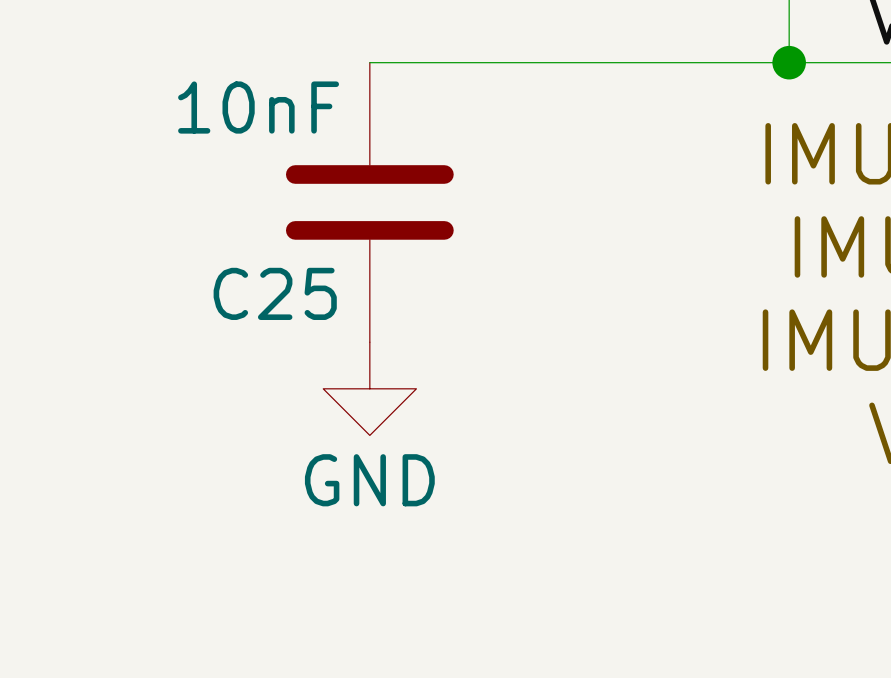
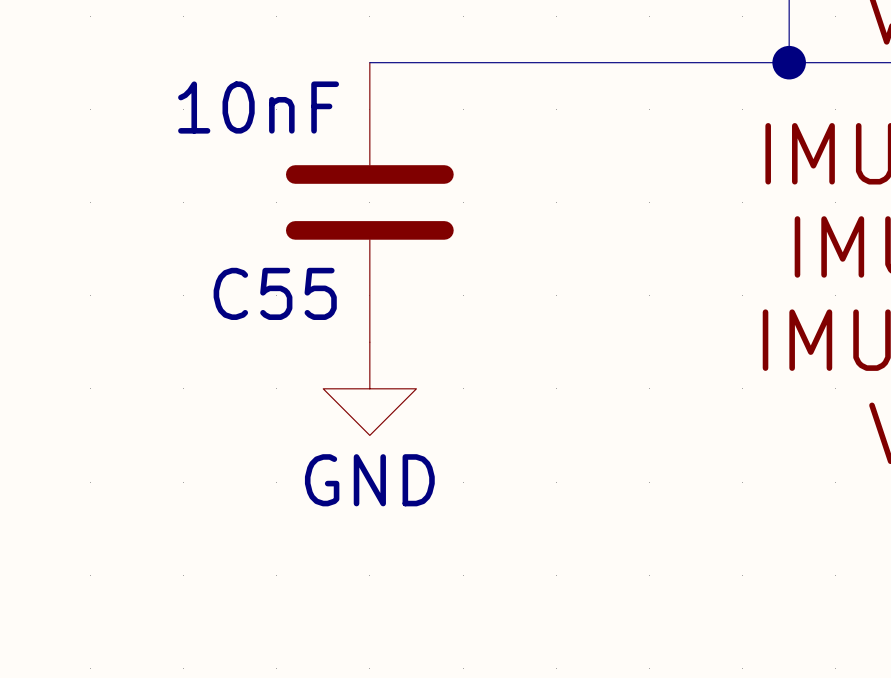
C25 name: C25 (275, 293) -> C55 (275, 293)

